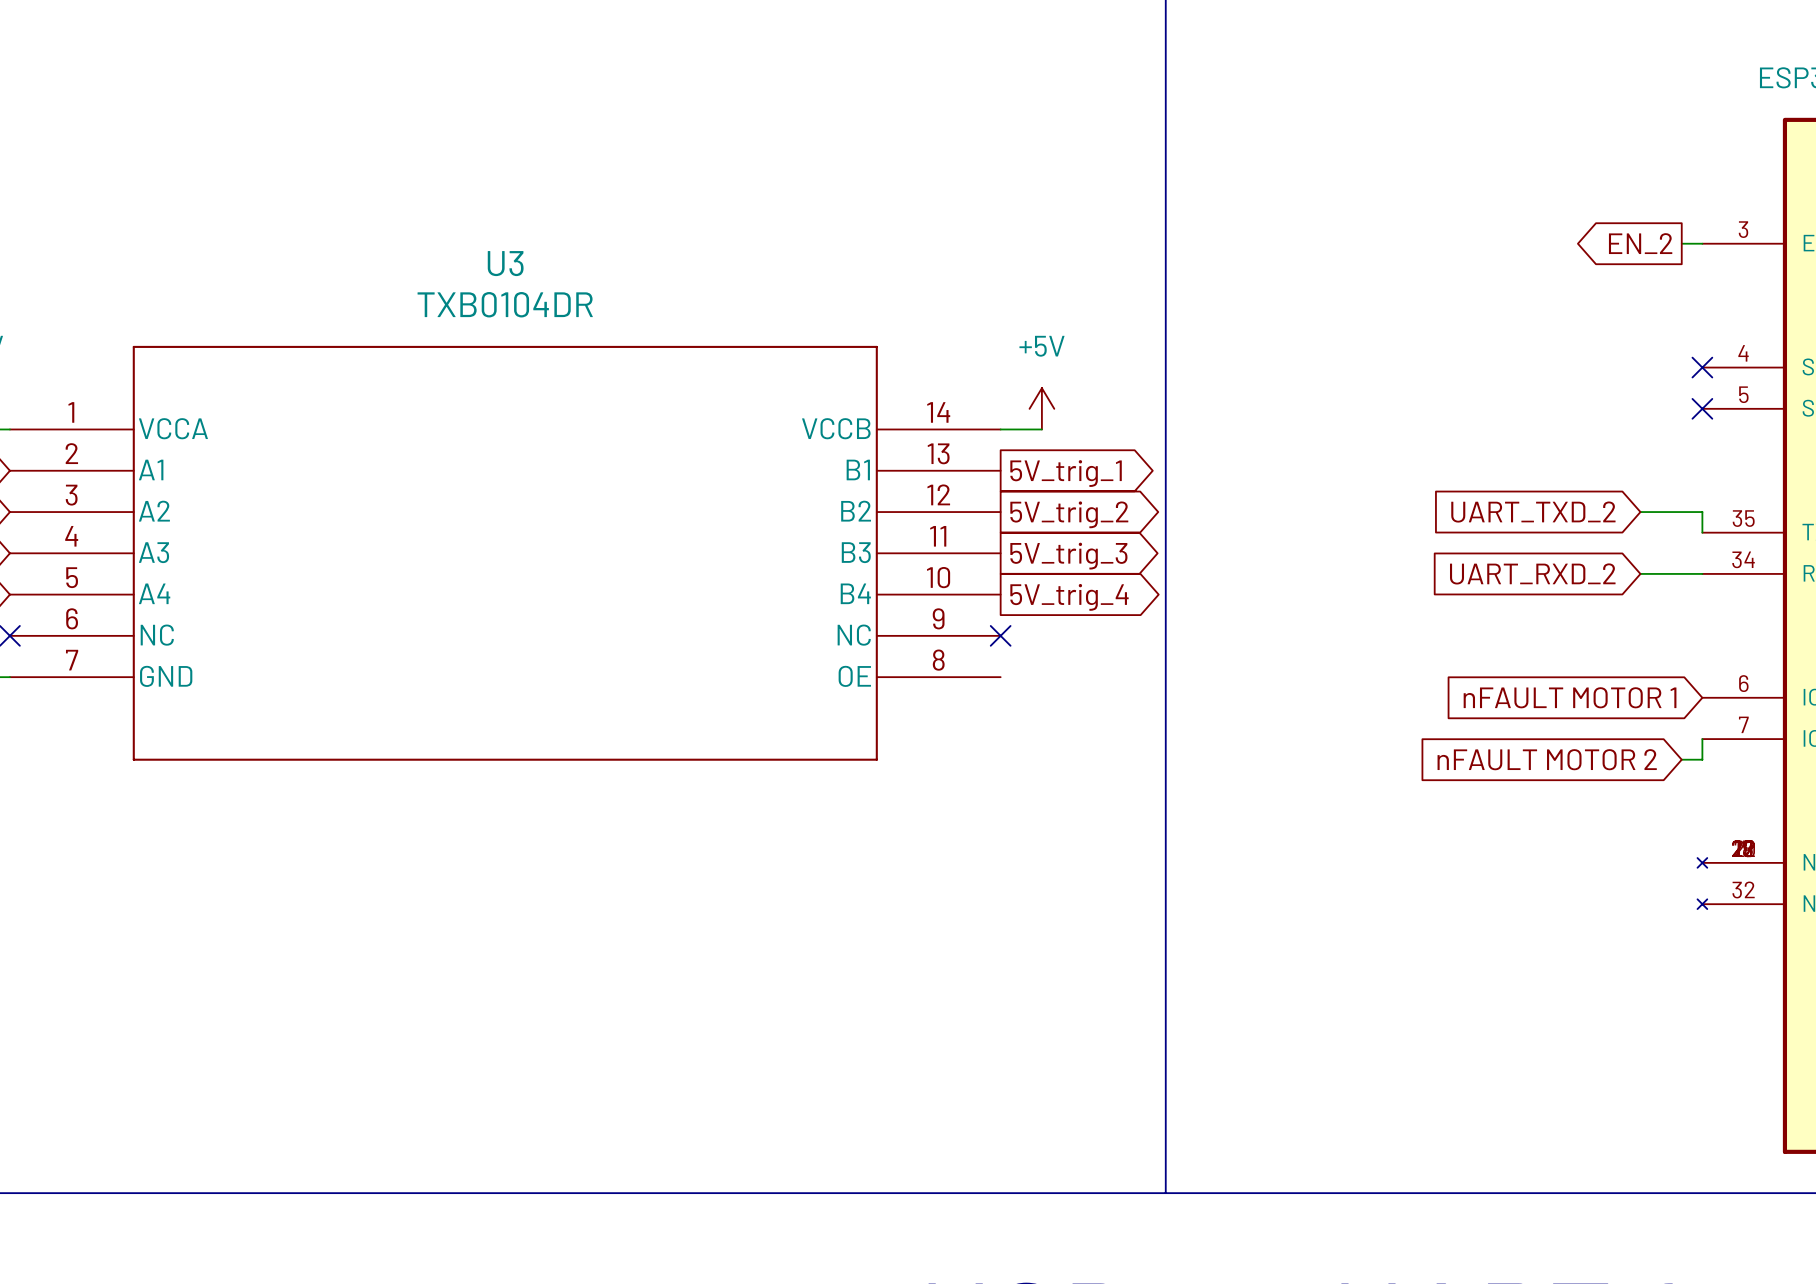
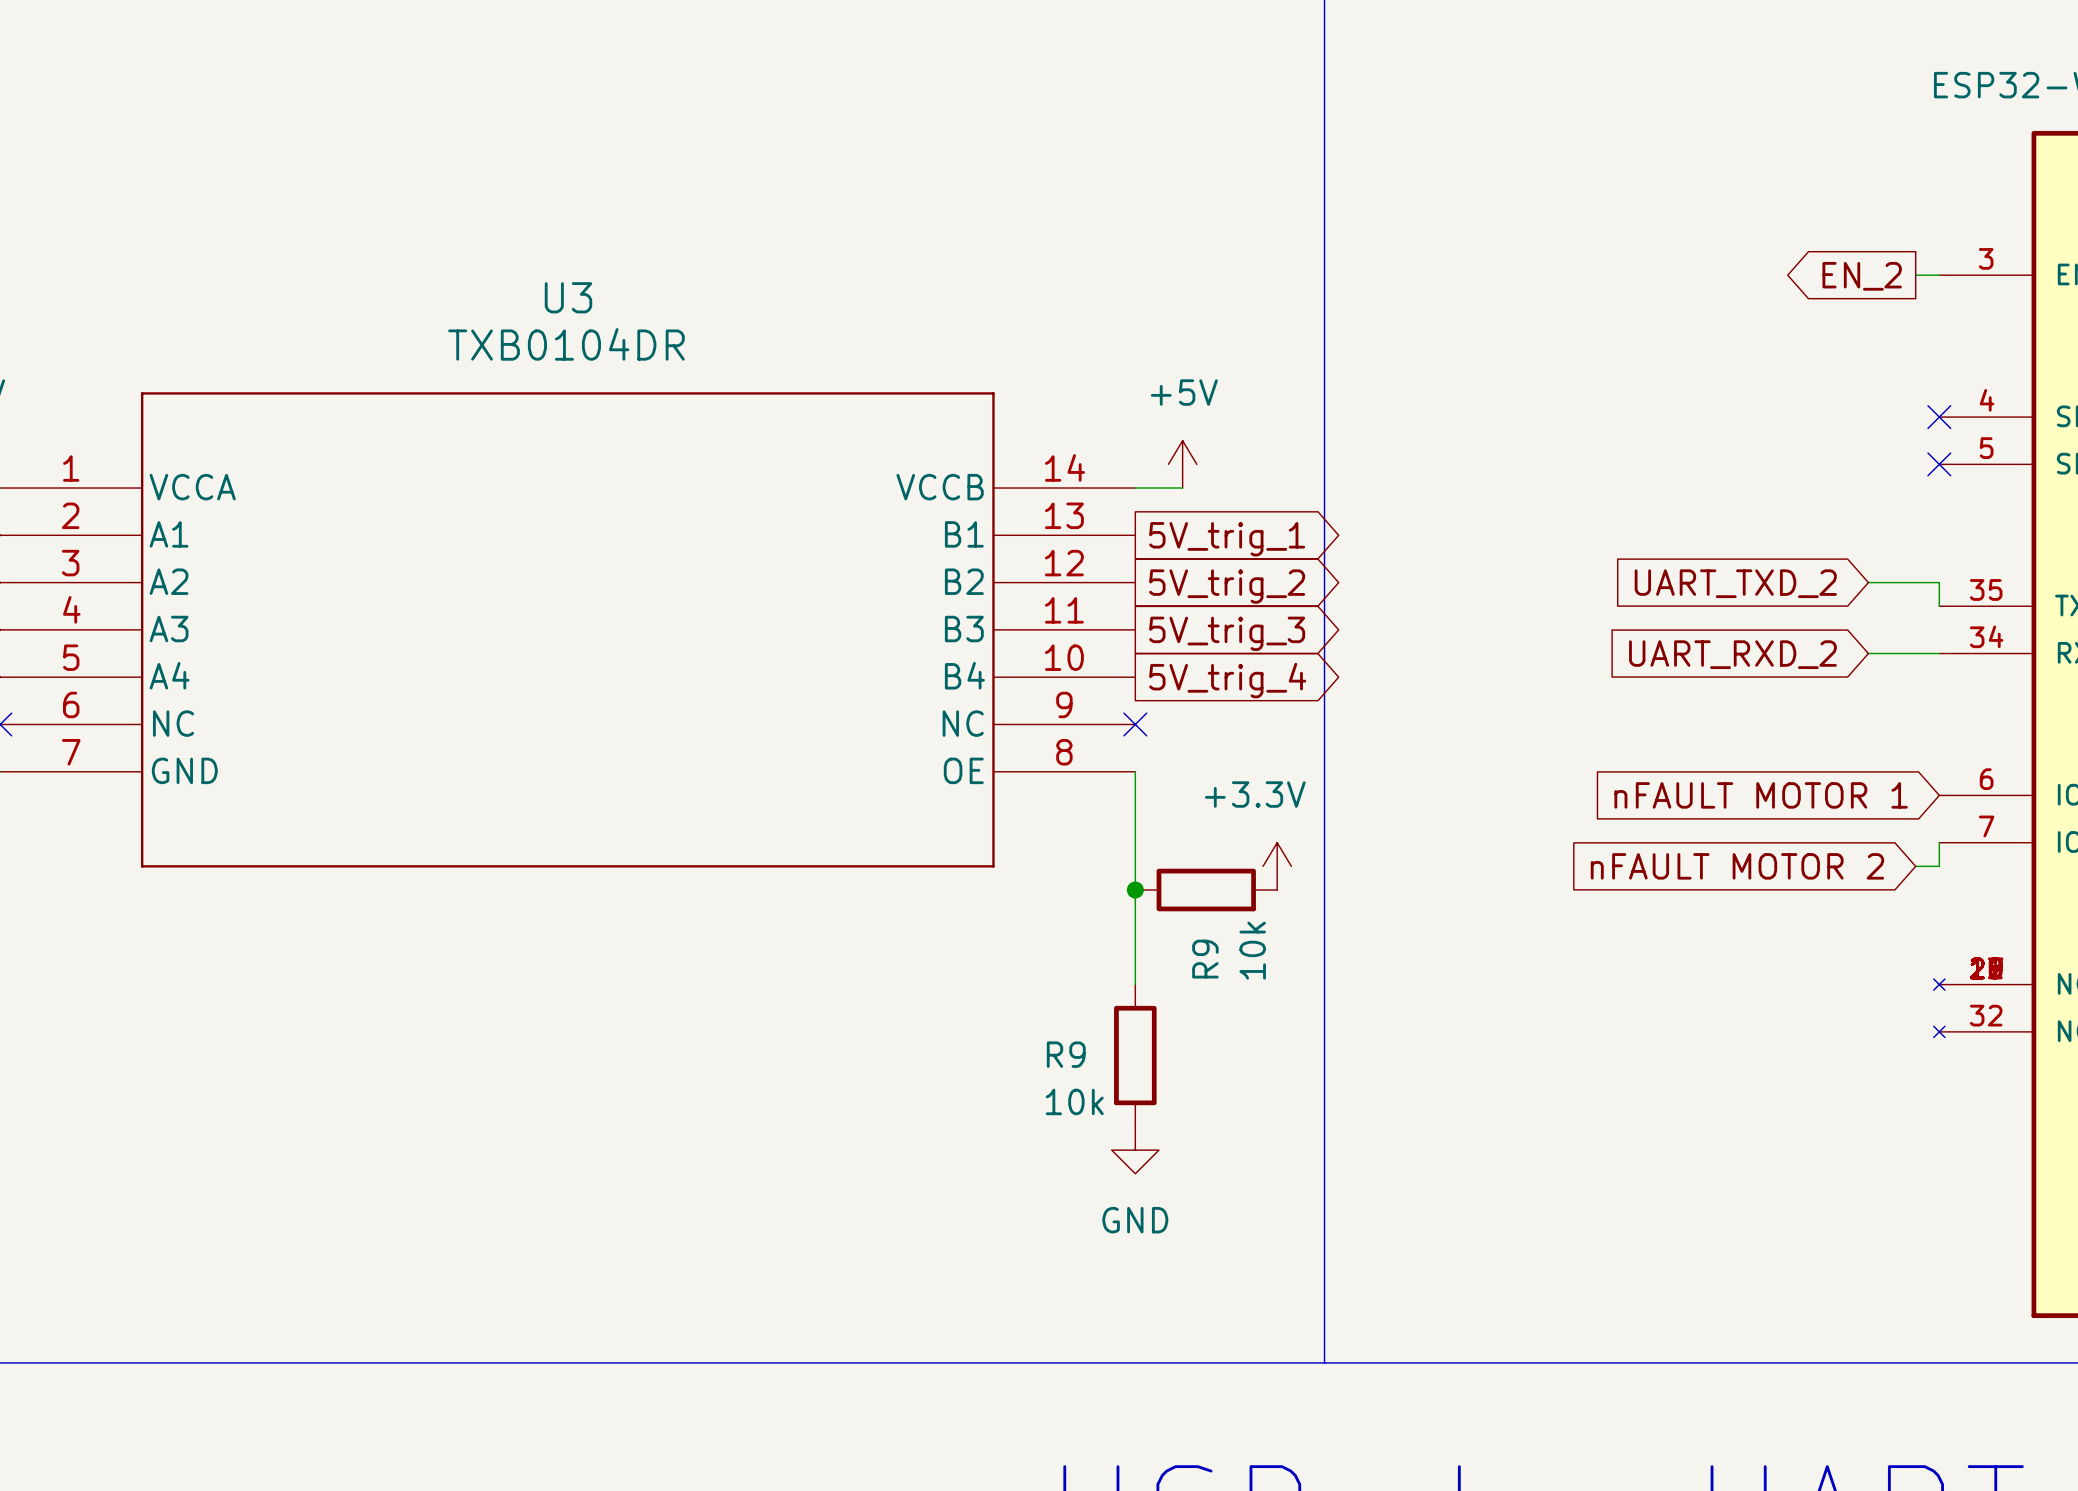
wire: none -> (1135, 771) (1135, 984)
power symbol: none -> +3.3V (1277, 866)
junction: none -> (1135, 890)
R9: none -> 10k (1206, 890)
R9: none -> 10k (1135, 1055)
power symbol: none -> GND (1135, 1150)

